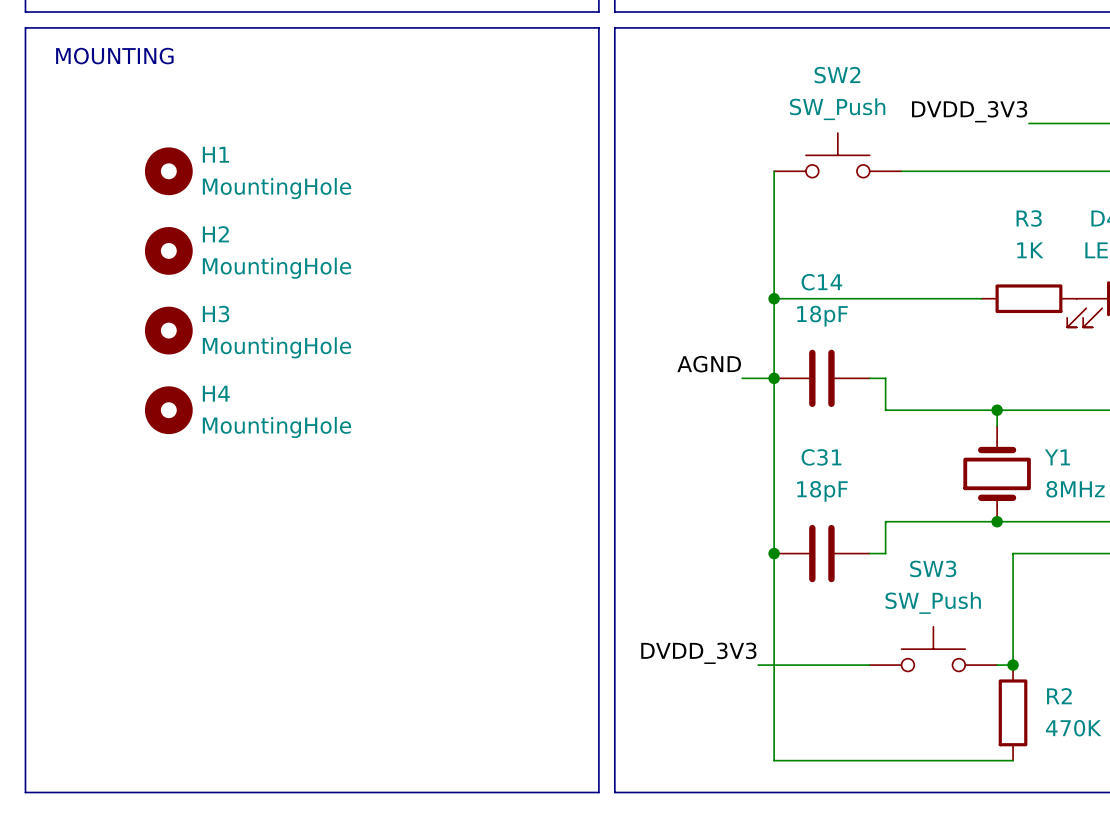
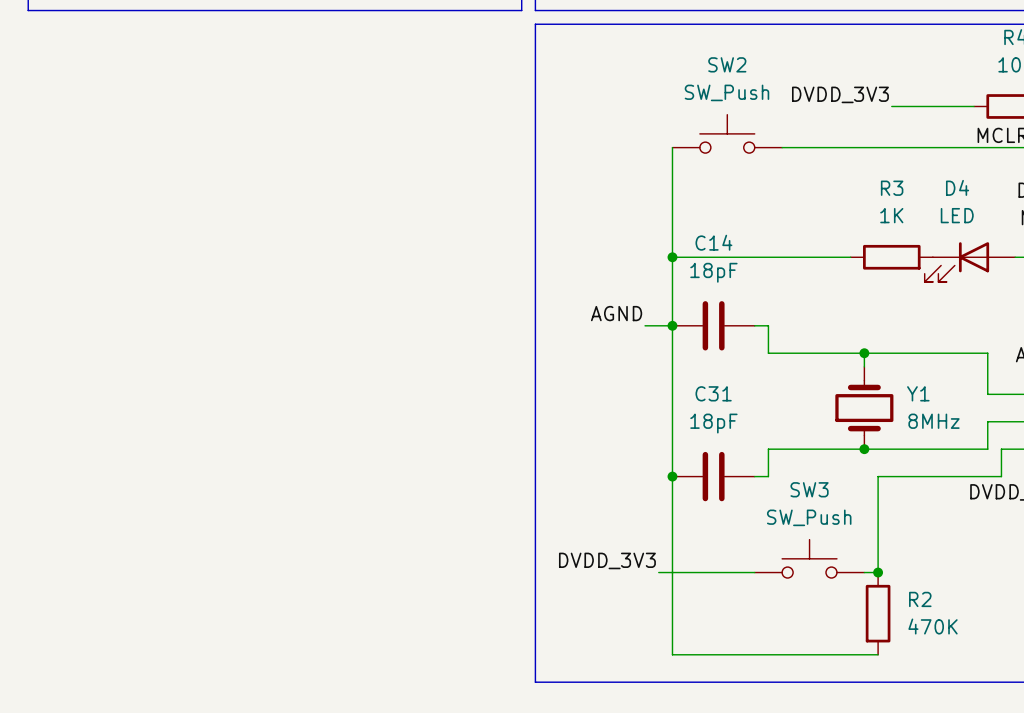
line: (25, 27) (598, 27) (598, 792) (25, 792) (25, 27) -> none
text: MOUNTING (114, 56) -> none
H1: MountingHole (168, 171) -> none
H2: MountingHole (168, 250) -> none
H3: MountingHole (168, 330) -> none
H4: MountingHole (168, 410) -> none

